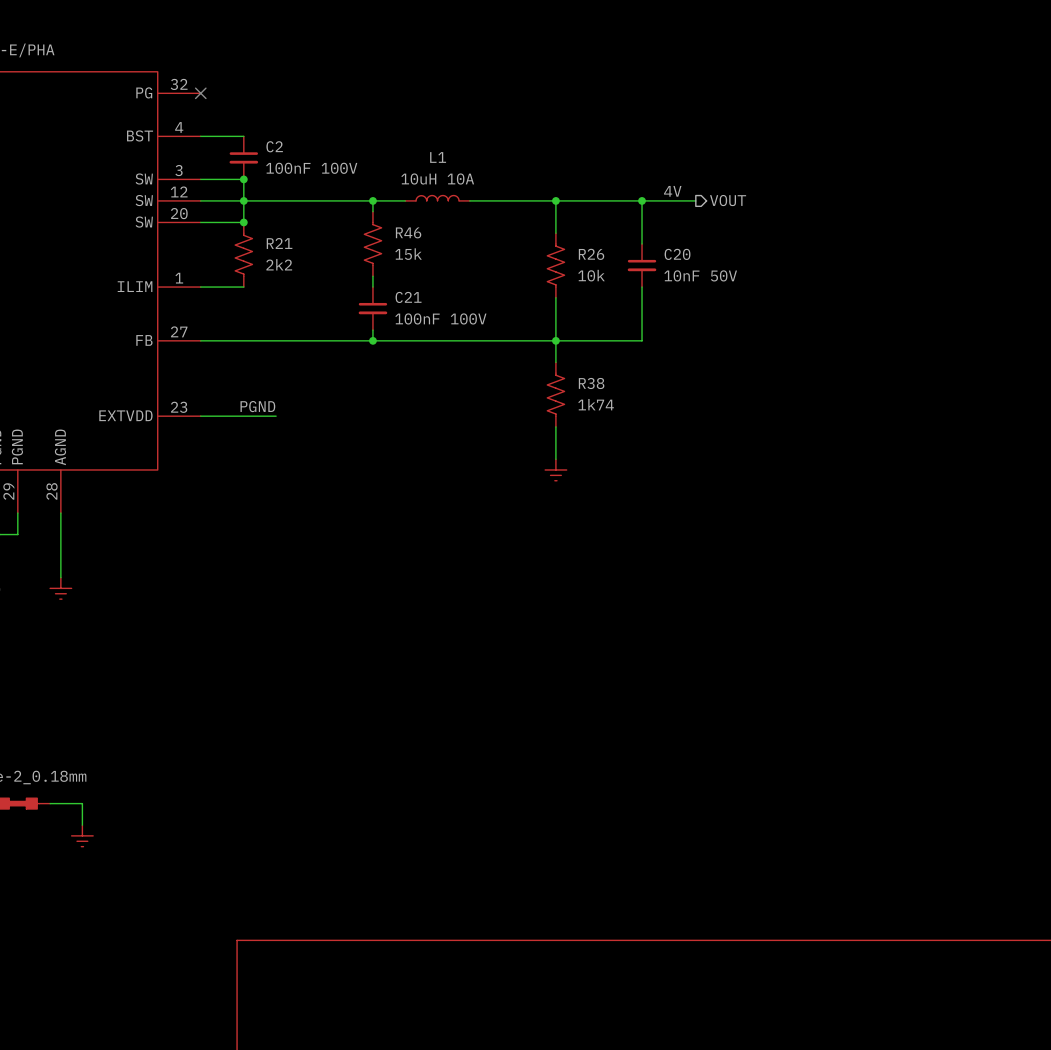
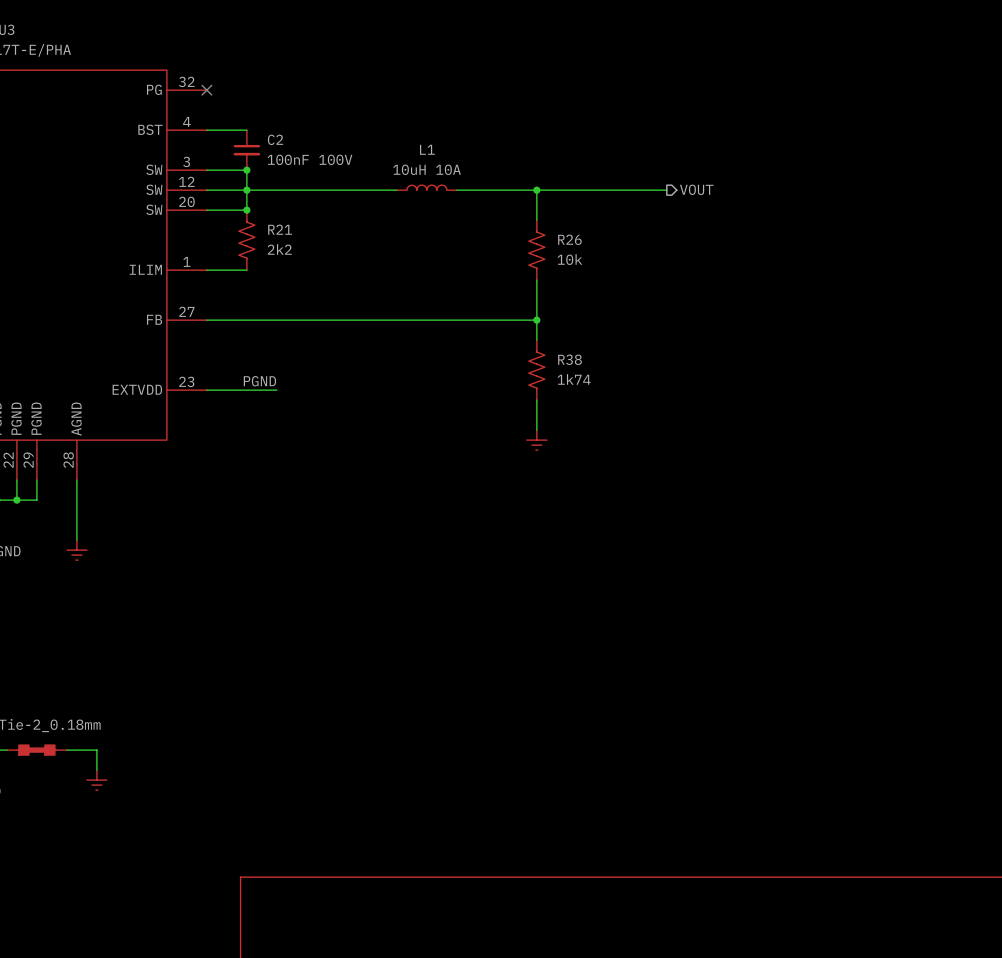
label: 4V (672, 191) -> none
wire: (372, 200) (372, 211) -> none
junction: (372, 200) -> none
wire: (642, 200) (642, 243) -> none
junction: (642, 200) -> none
R46: 15k (372, 243) -> none
C20: 10nF 50V (642, 265) -> none
wire: (372, 276) (372, 287) -> none
wire: (642, 287) (642, 340) (555, 340) -> none
C21: 100nF 100V (372, 308) -> none
wire: (372, 330) (372, 340) -> none
junction: (372, 340) -> none

